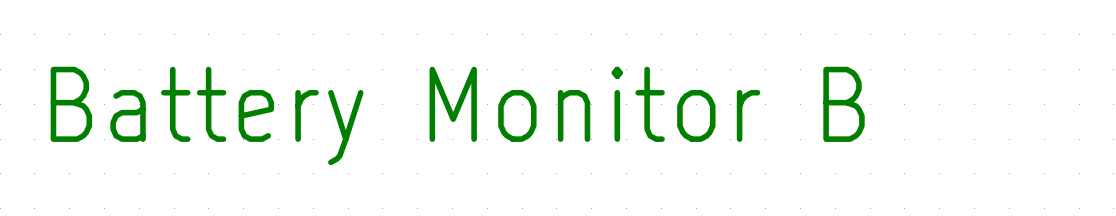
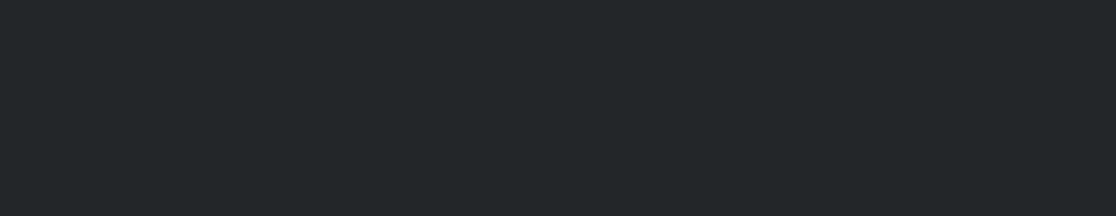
text: Battery Monitor B (457, 115) -> none

